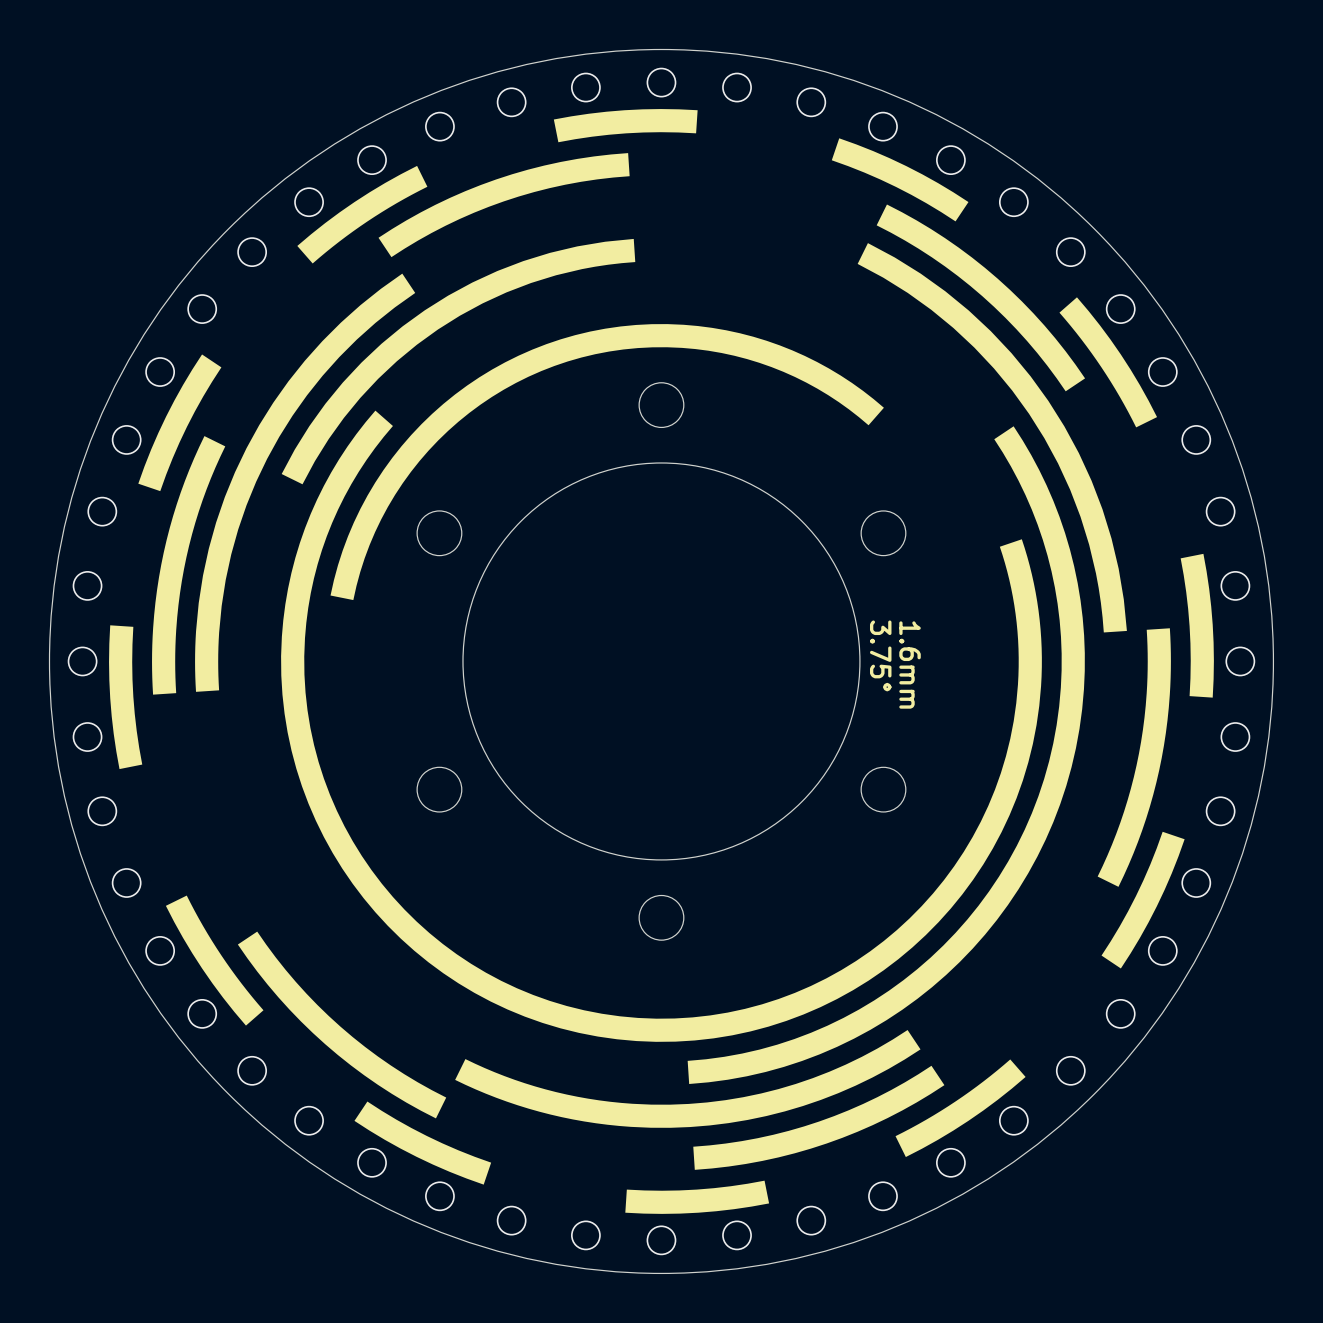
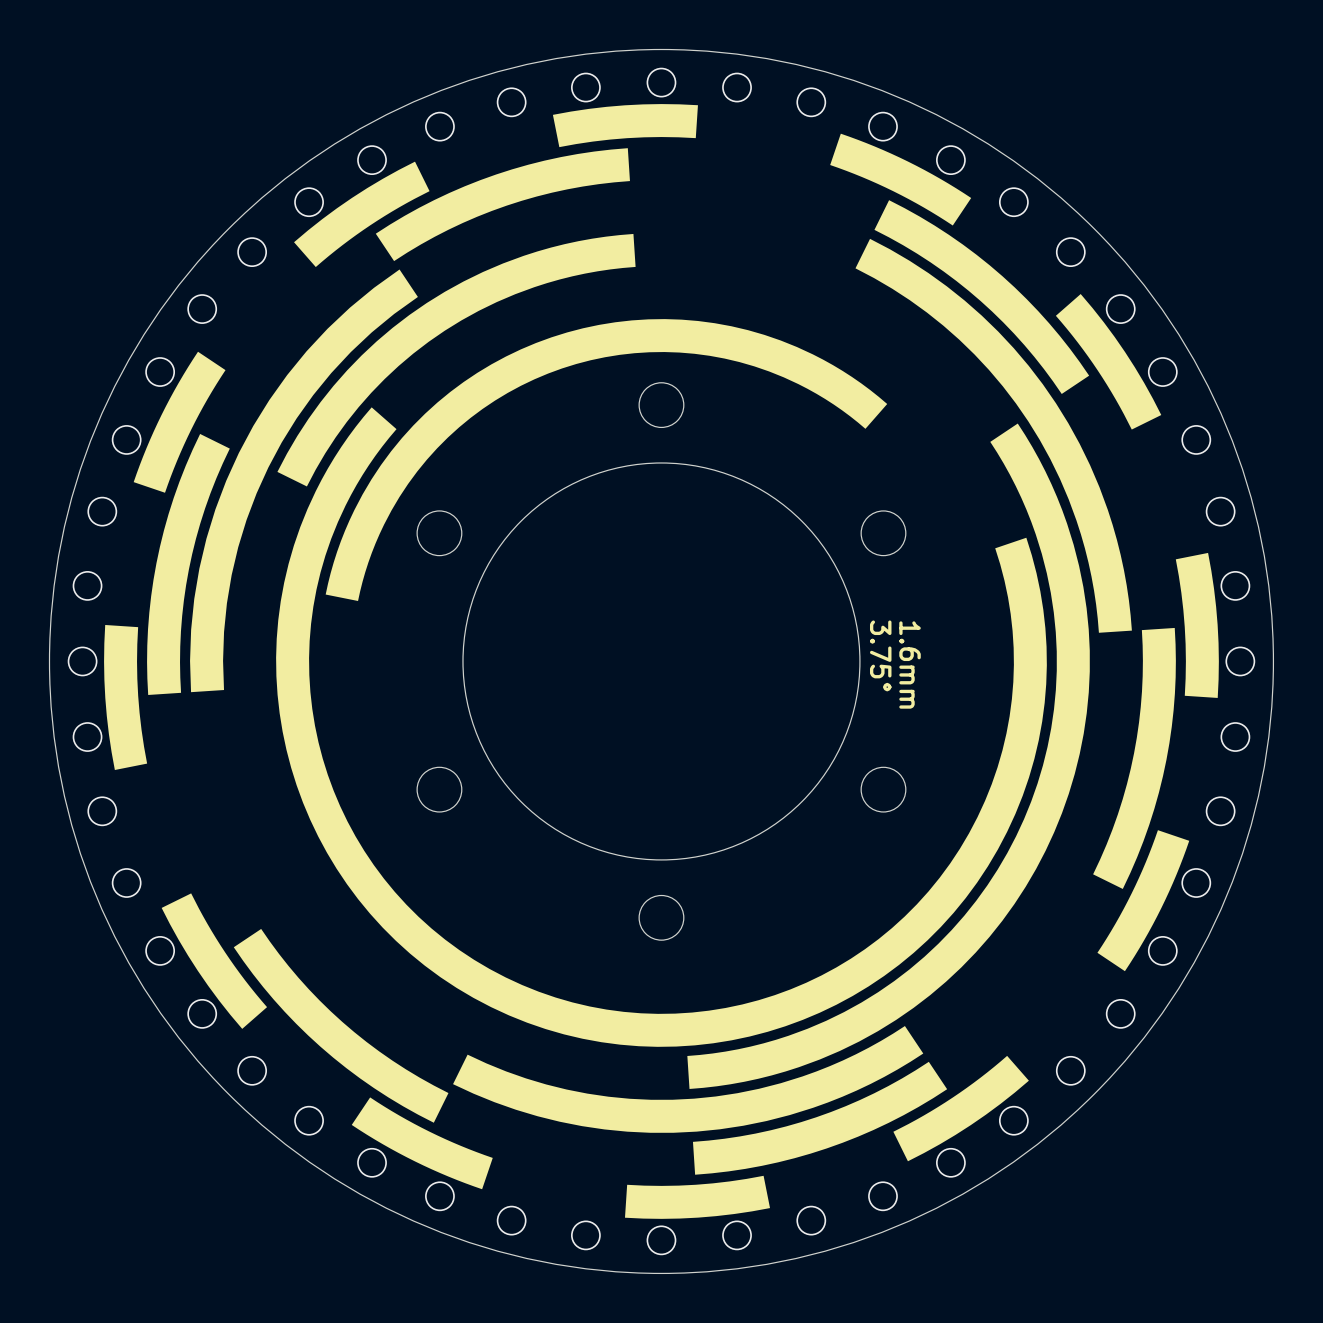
drawing shape: [109, 109, 1214, 1214] -> [104, 104, 1219, 1219]

